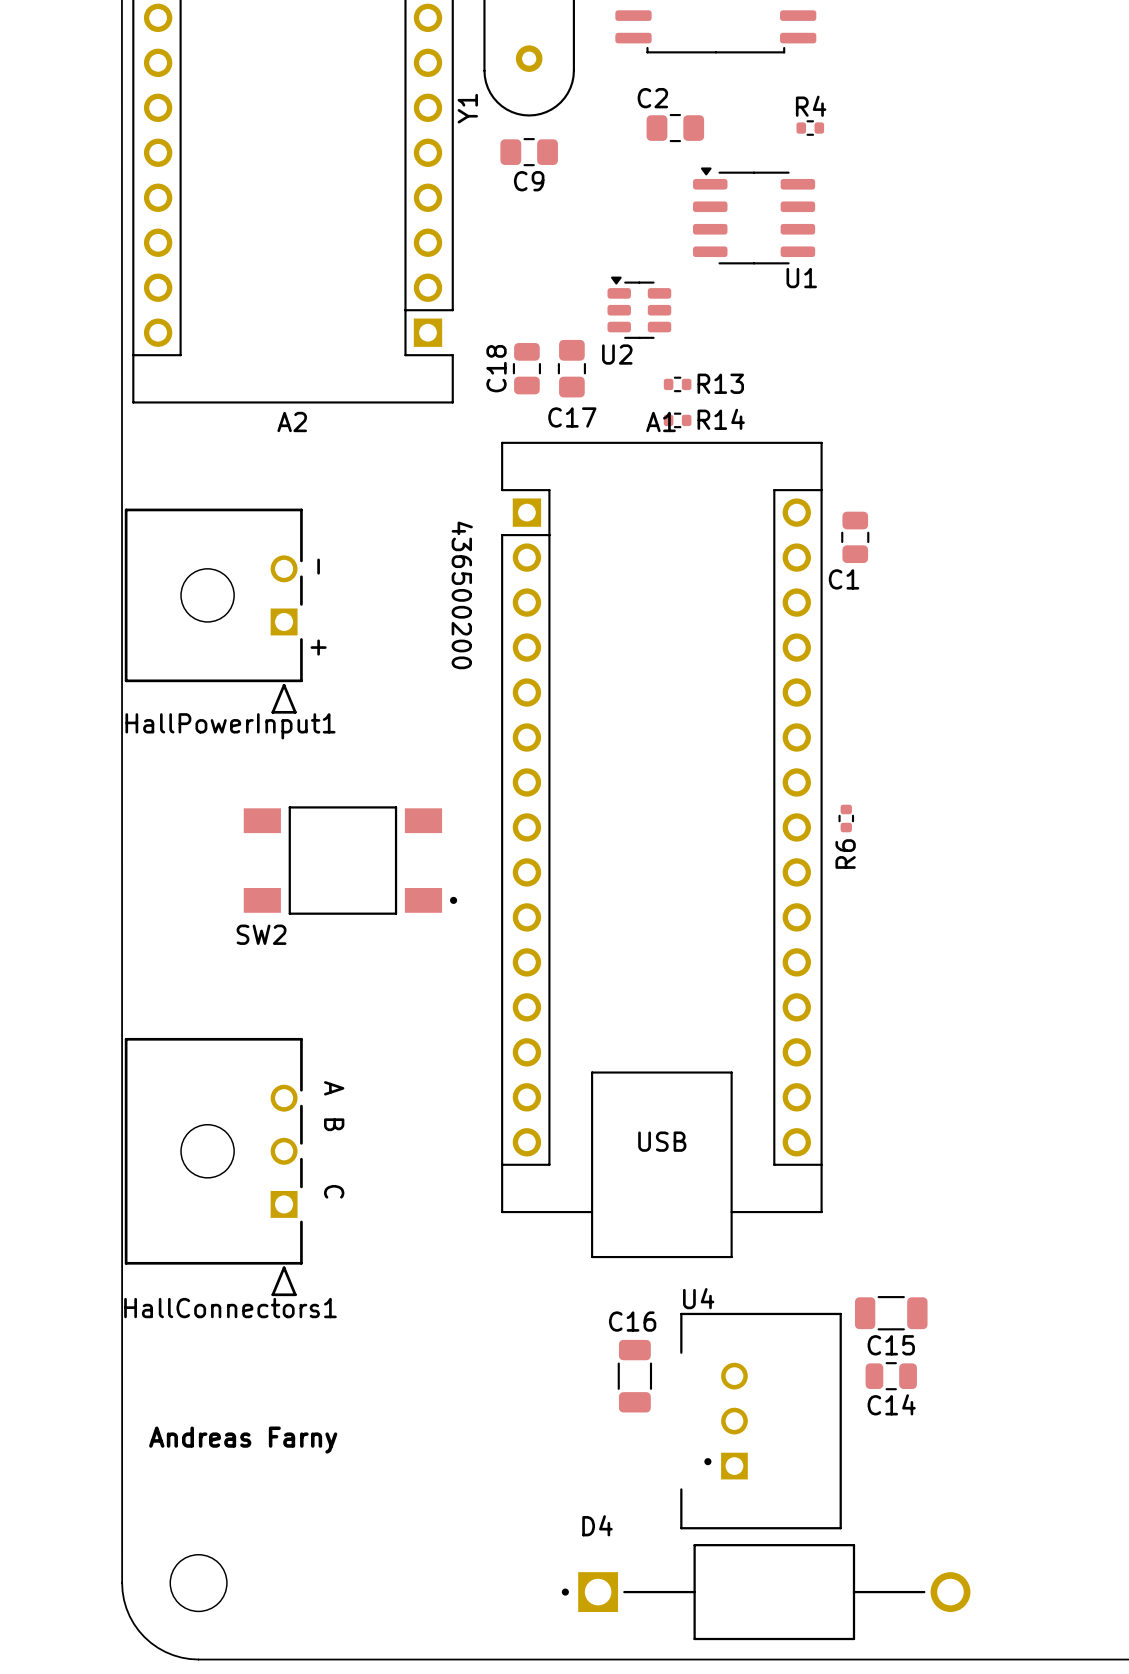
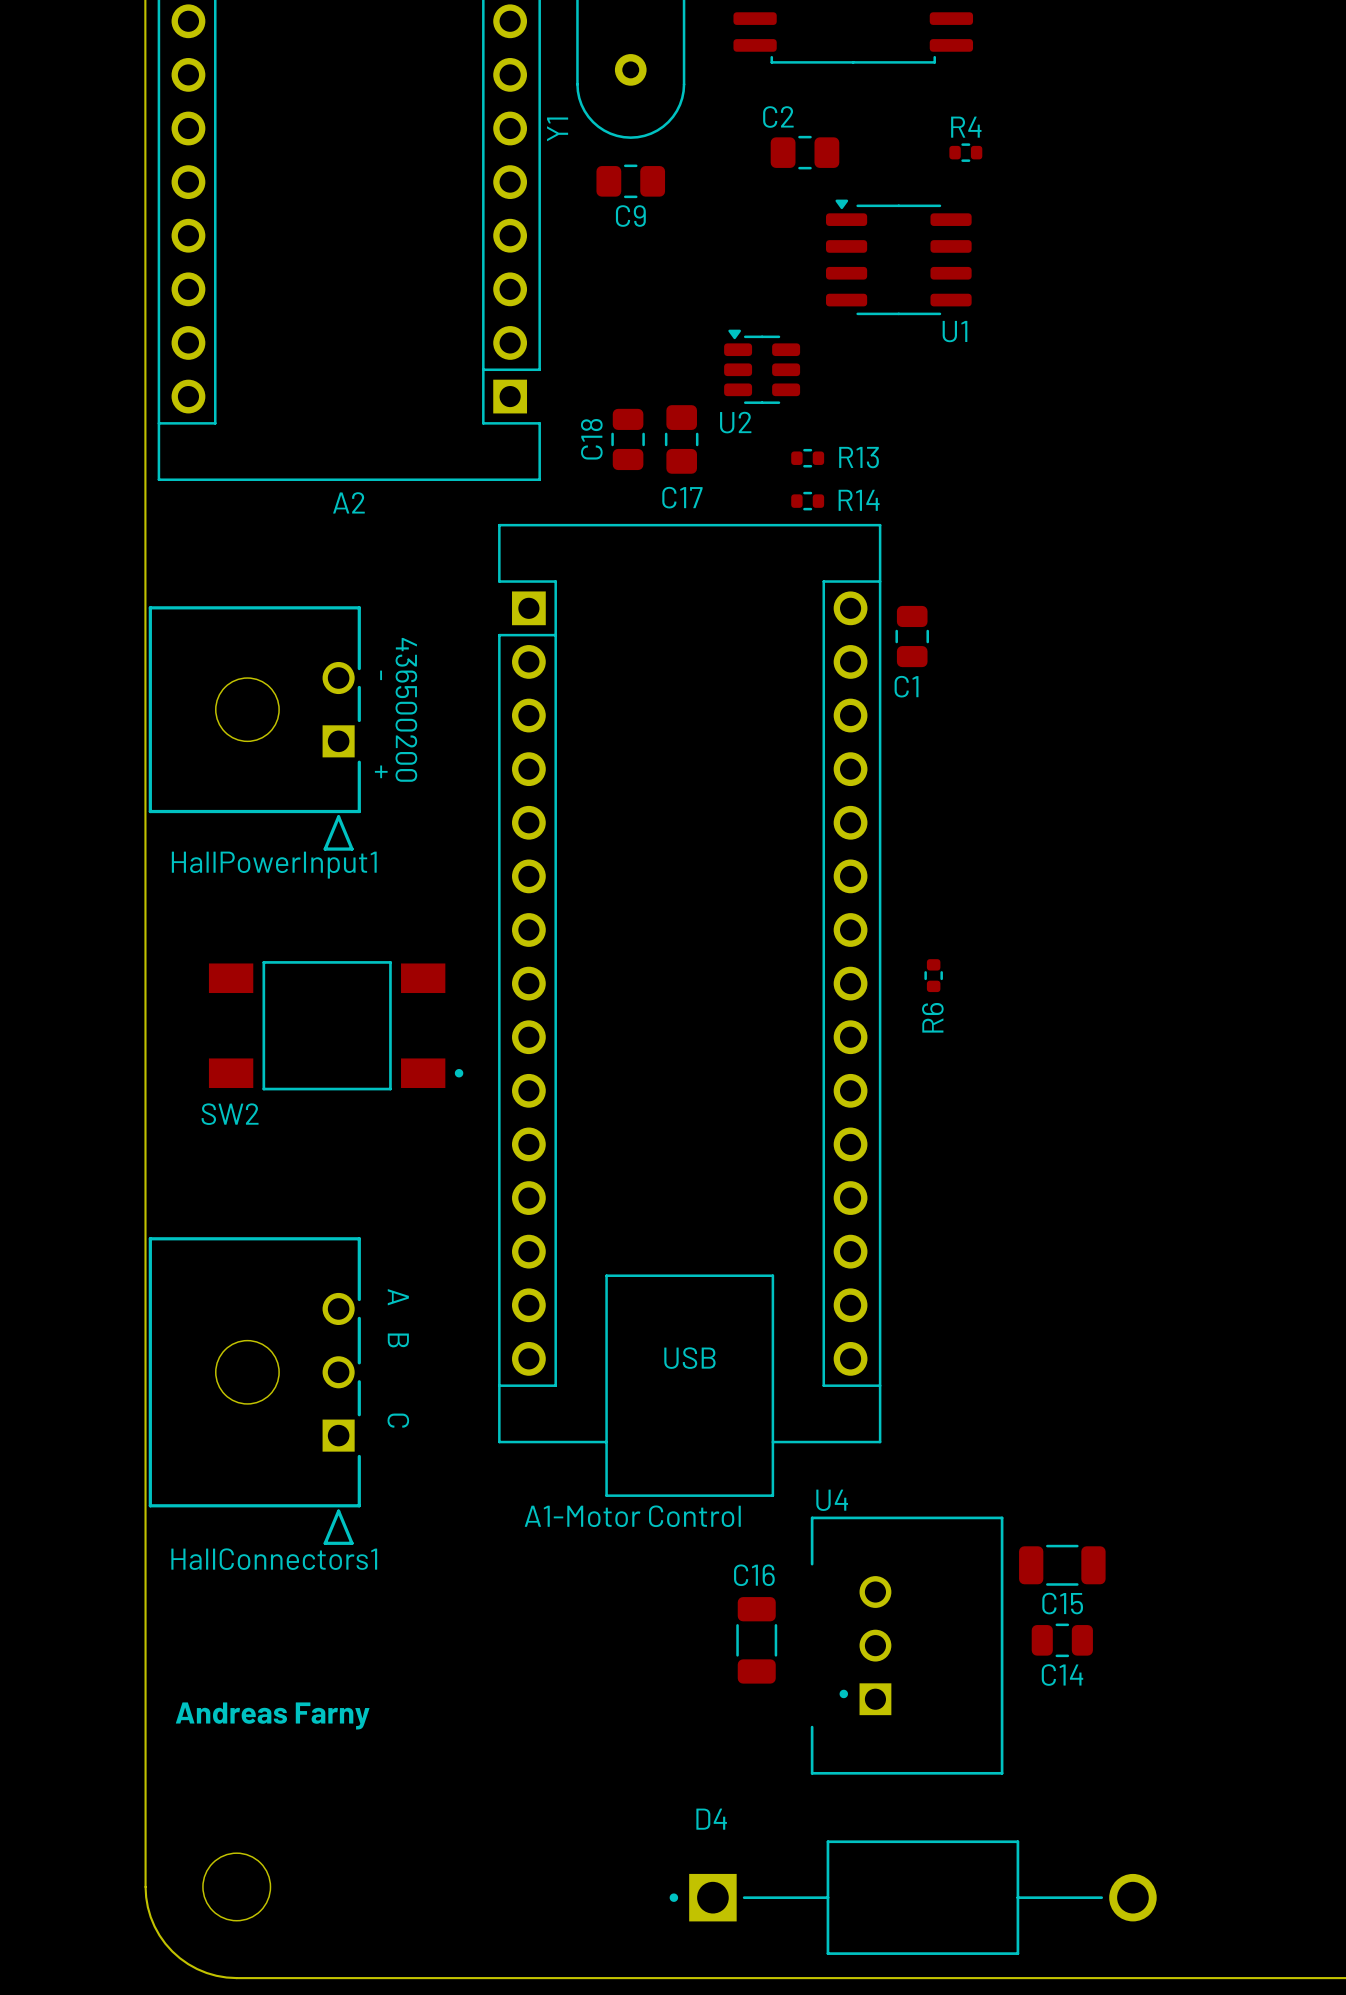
C1 position: (855, 537) -> (912, 636)
C1 name position: C1 (844, 579) -> C1 (906, 686)
HallPowerInput1 text position: 436500200 (462, 595) -> 436500200 (406, 709)
R6 position: (846, 818) -> (933, 975)
A1-Motor Control: none -> (689, 1010)
A1: (661, 849) -> none
SW2 position: (350, 860) -> (336, 1025)
U4 position: (761, 1421) -> (907, 1645)

